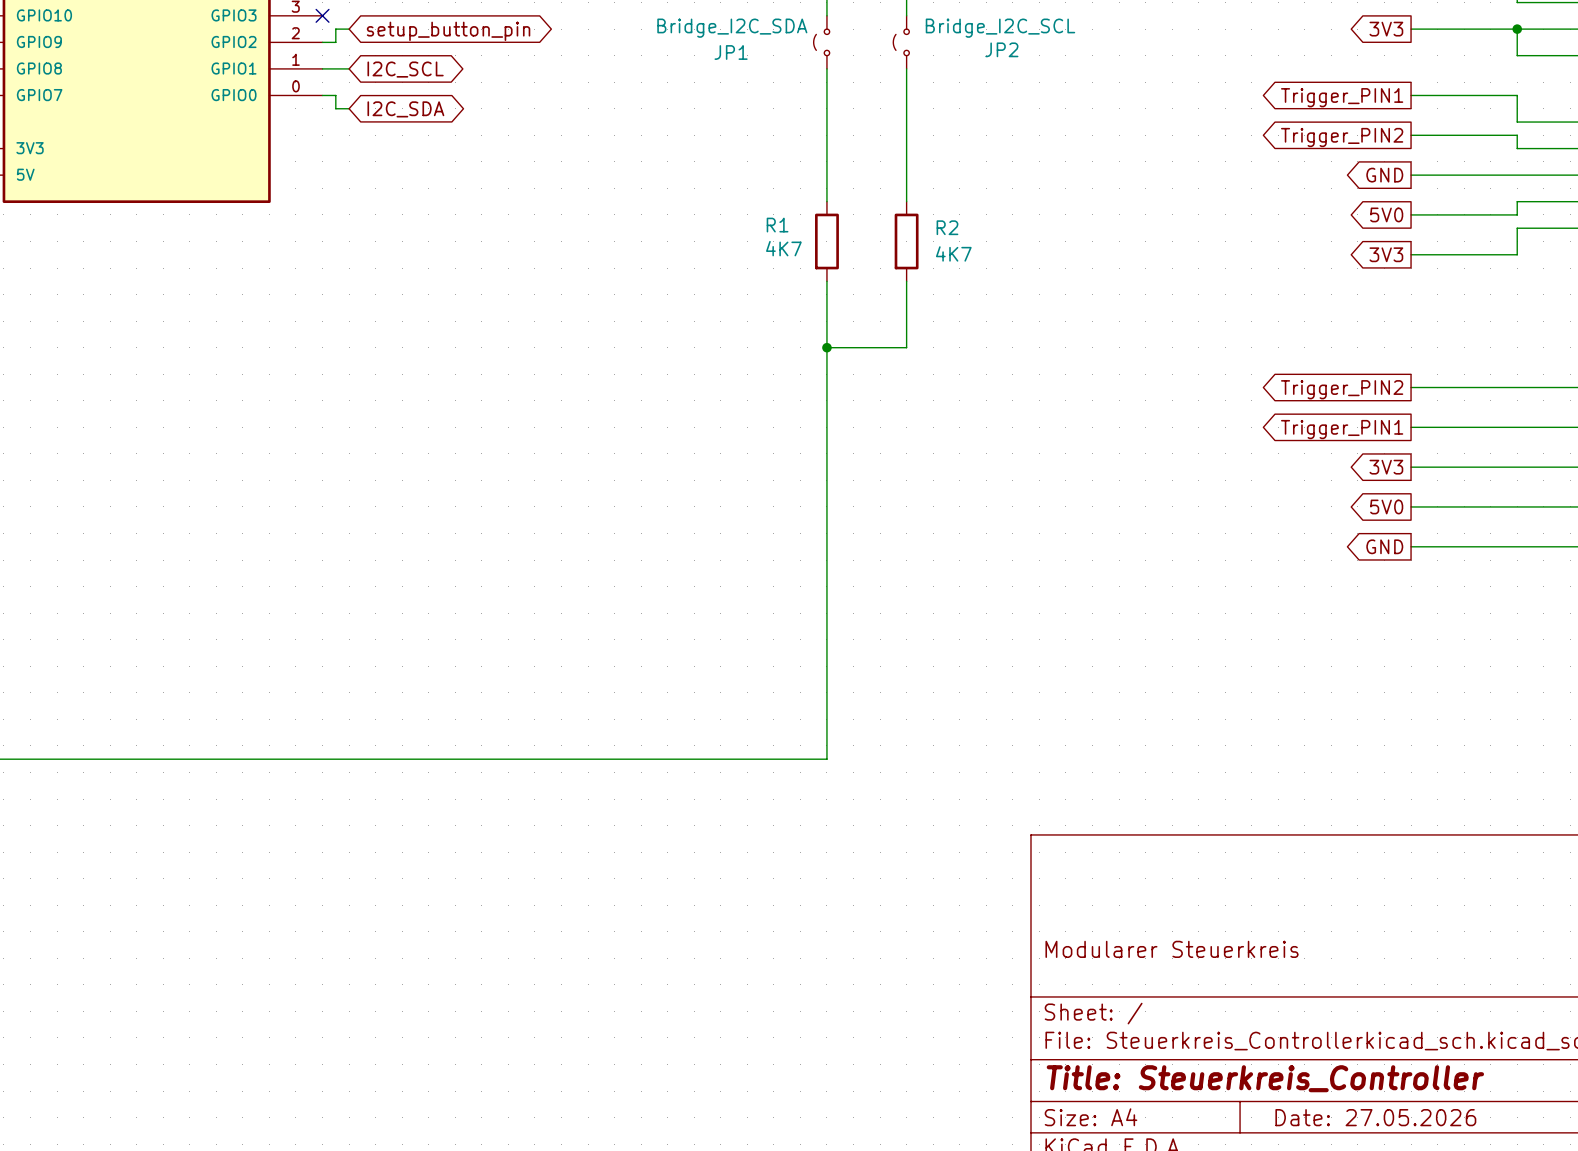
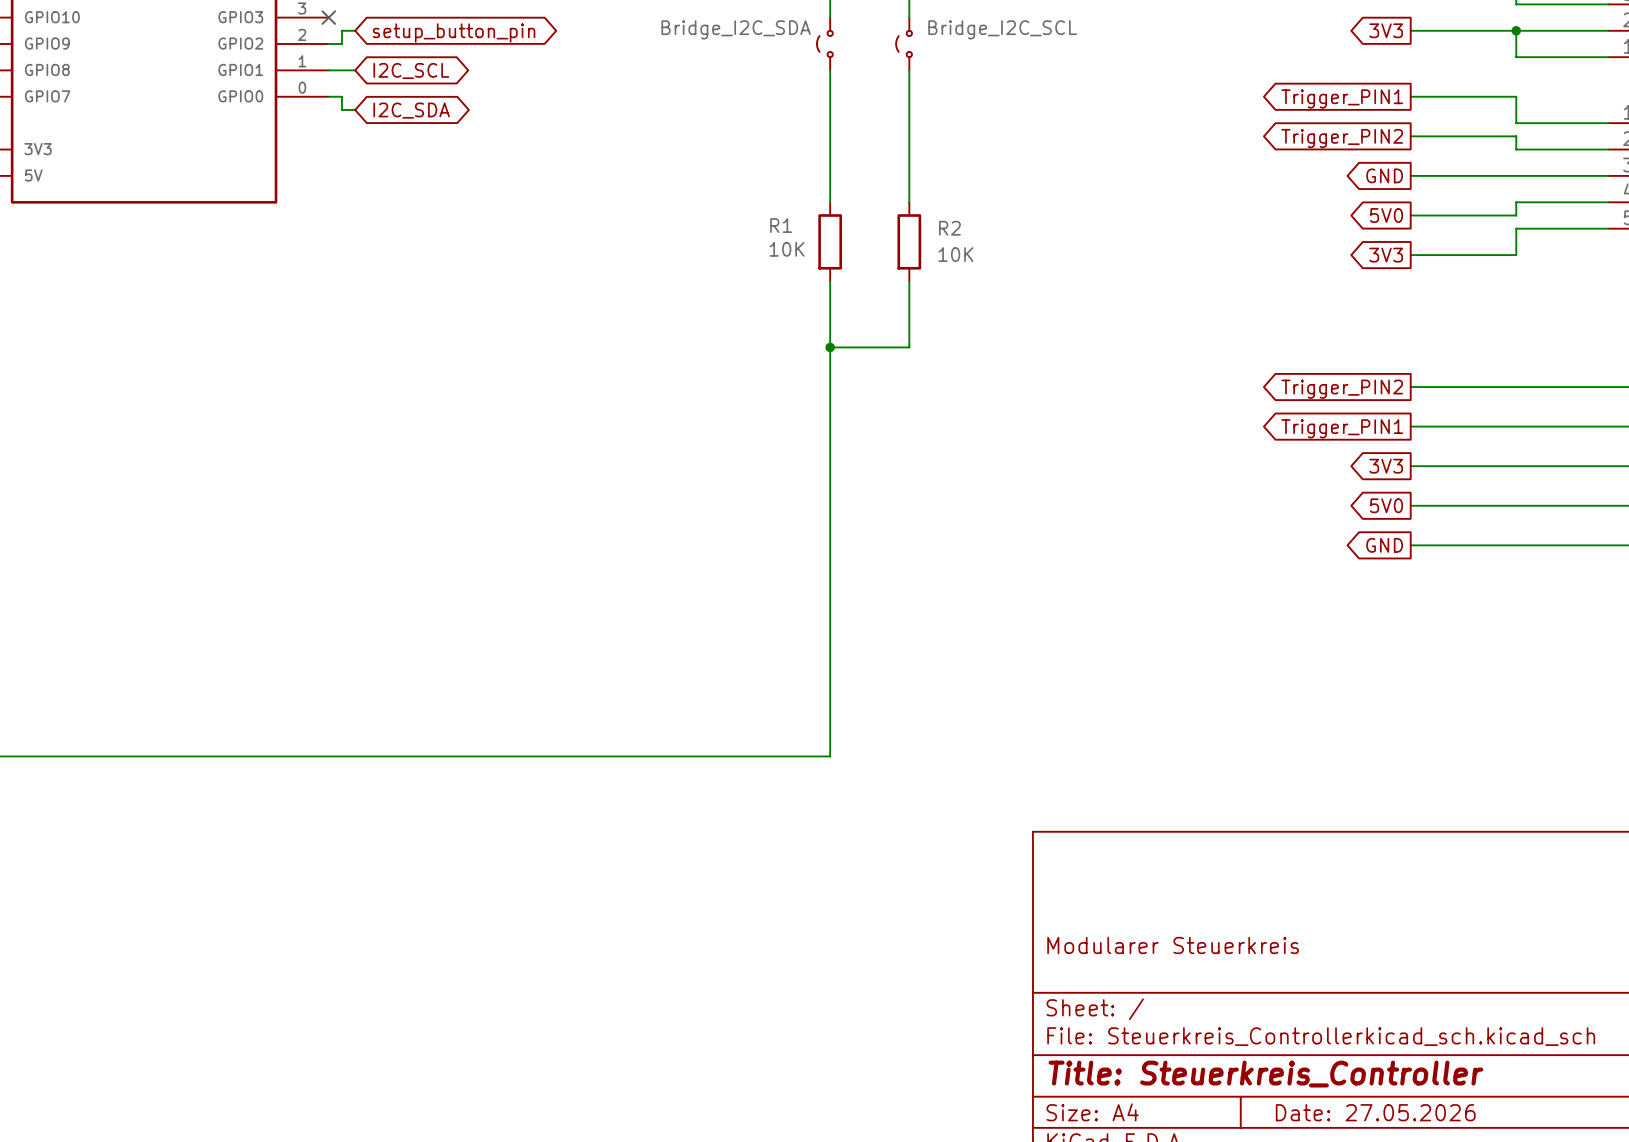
JP2 name: JP2 (1001, 49) -> none
JP1 name: JP1 (731, 52) -> none
R1 value: 4K7 (783, 248) -> 10K (787, 249)
R2 value: 4K7 (953, 253) -> 10K (955, 254)

